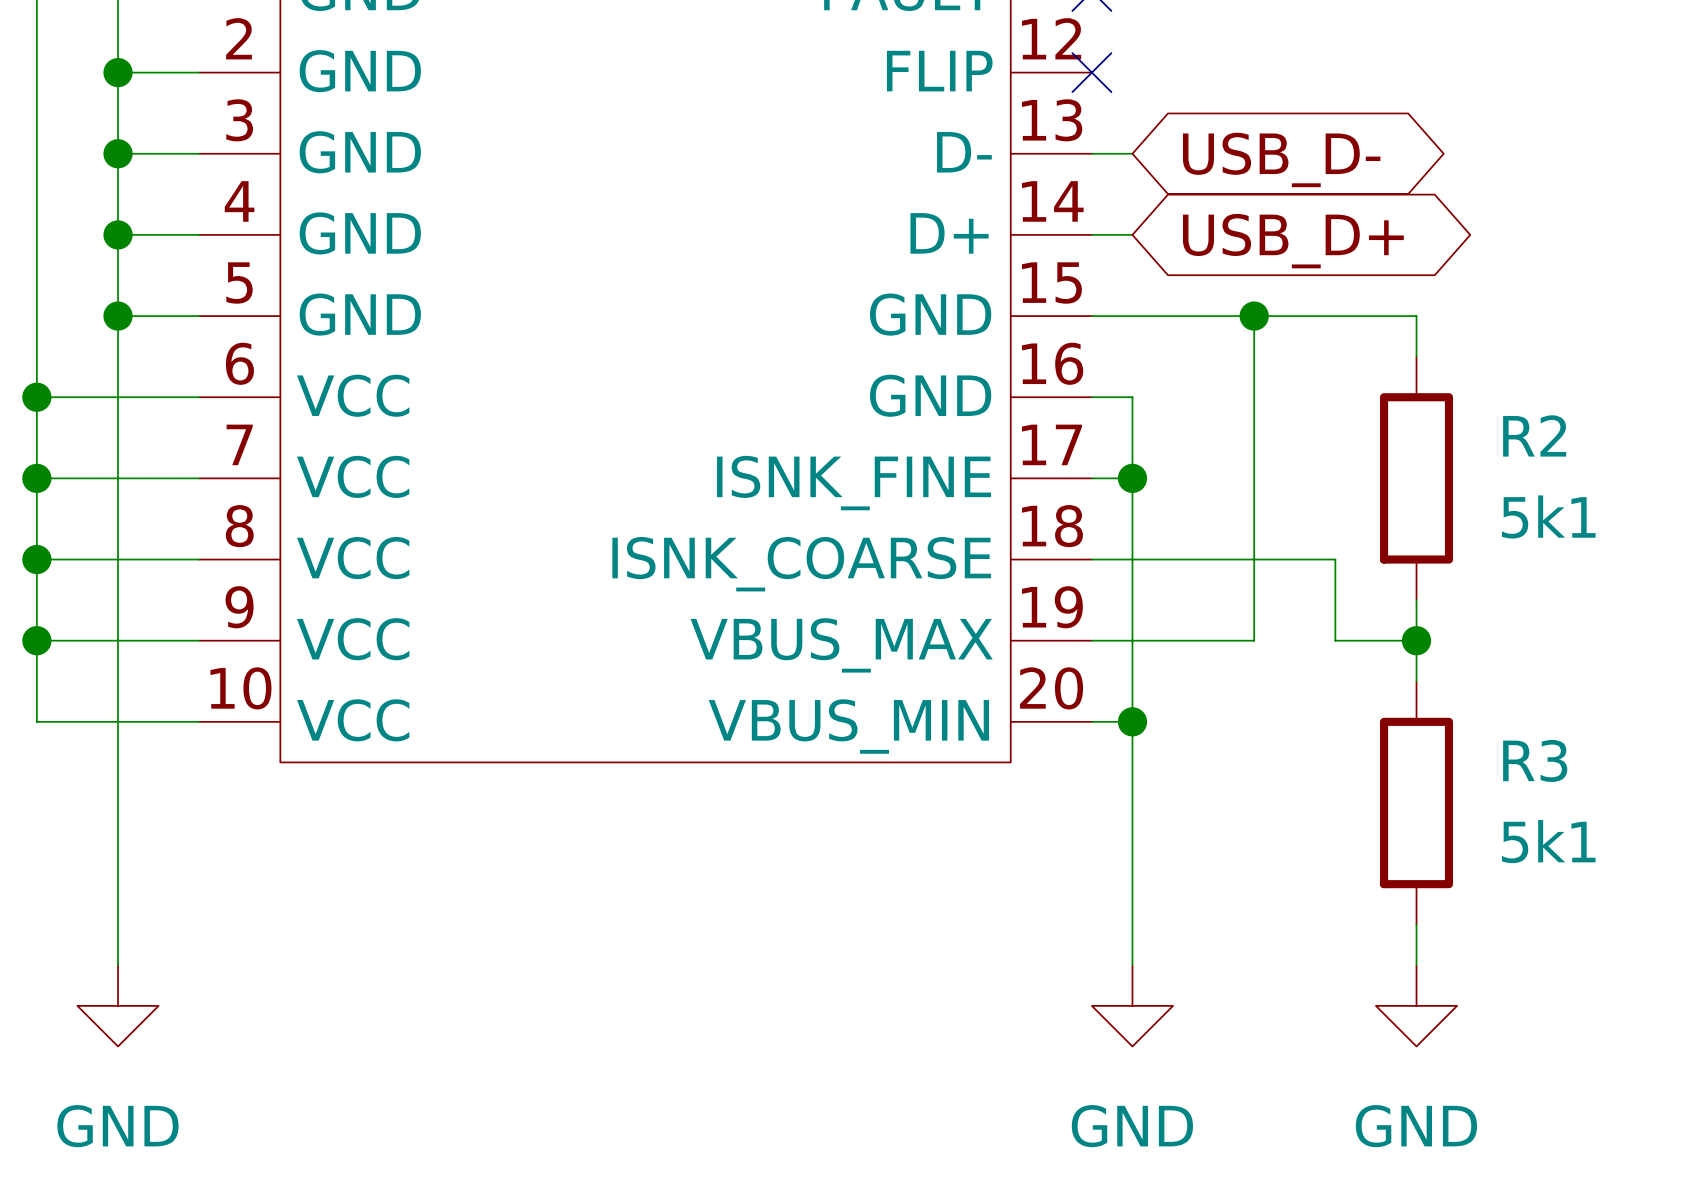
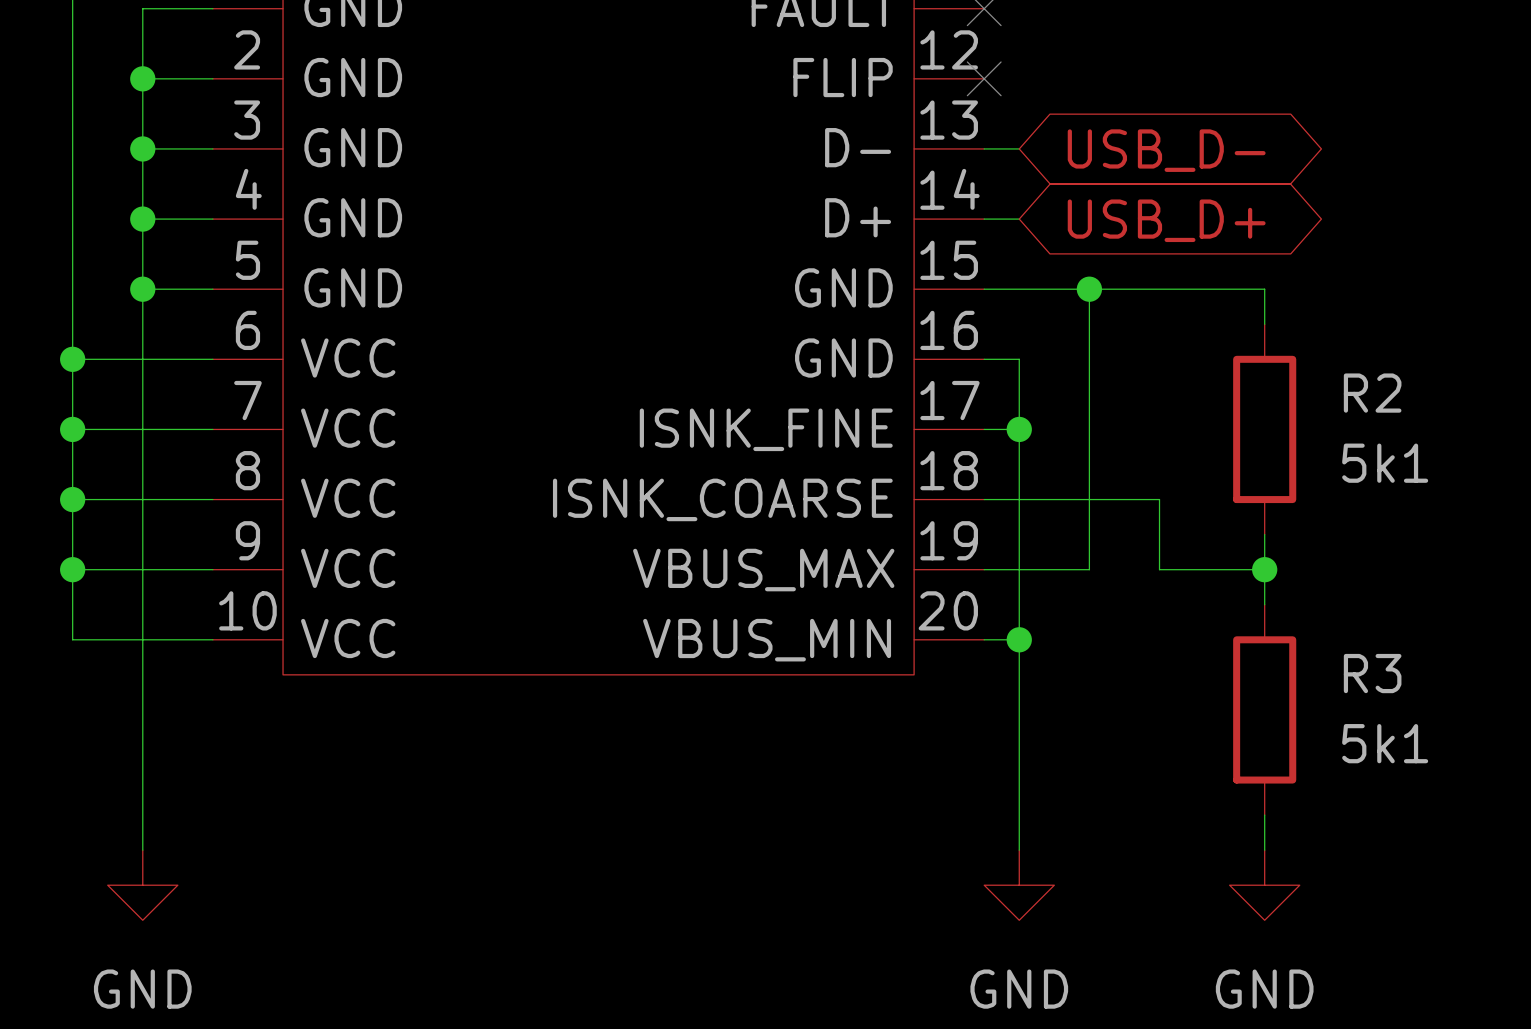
wire: (1254, 316) (1254, 640) (1213, 640) -> (1089, 289) (1089, 569)
junction position: (1254, 316) -> (1089, 289)
wire: (1294, 559) (1335, 559) (1335, 640) -> (1159, 499) (1159, 569) (1194, 569)

